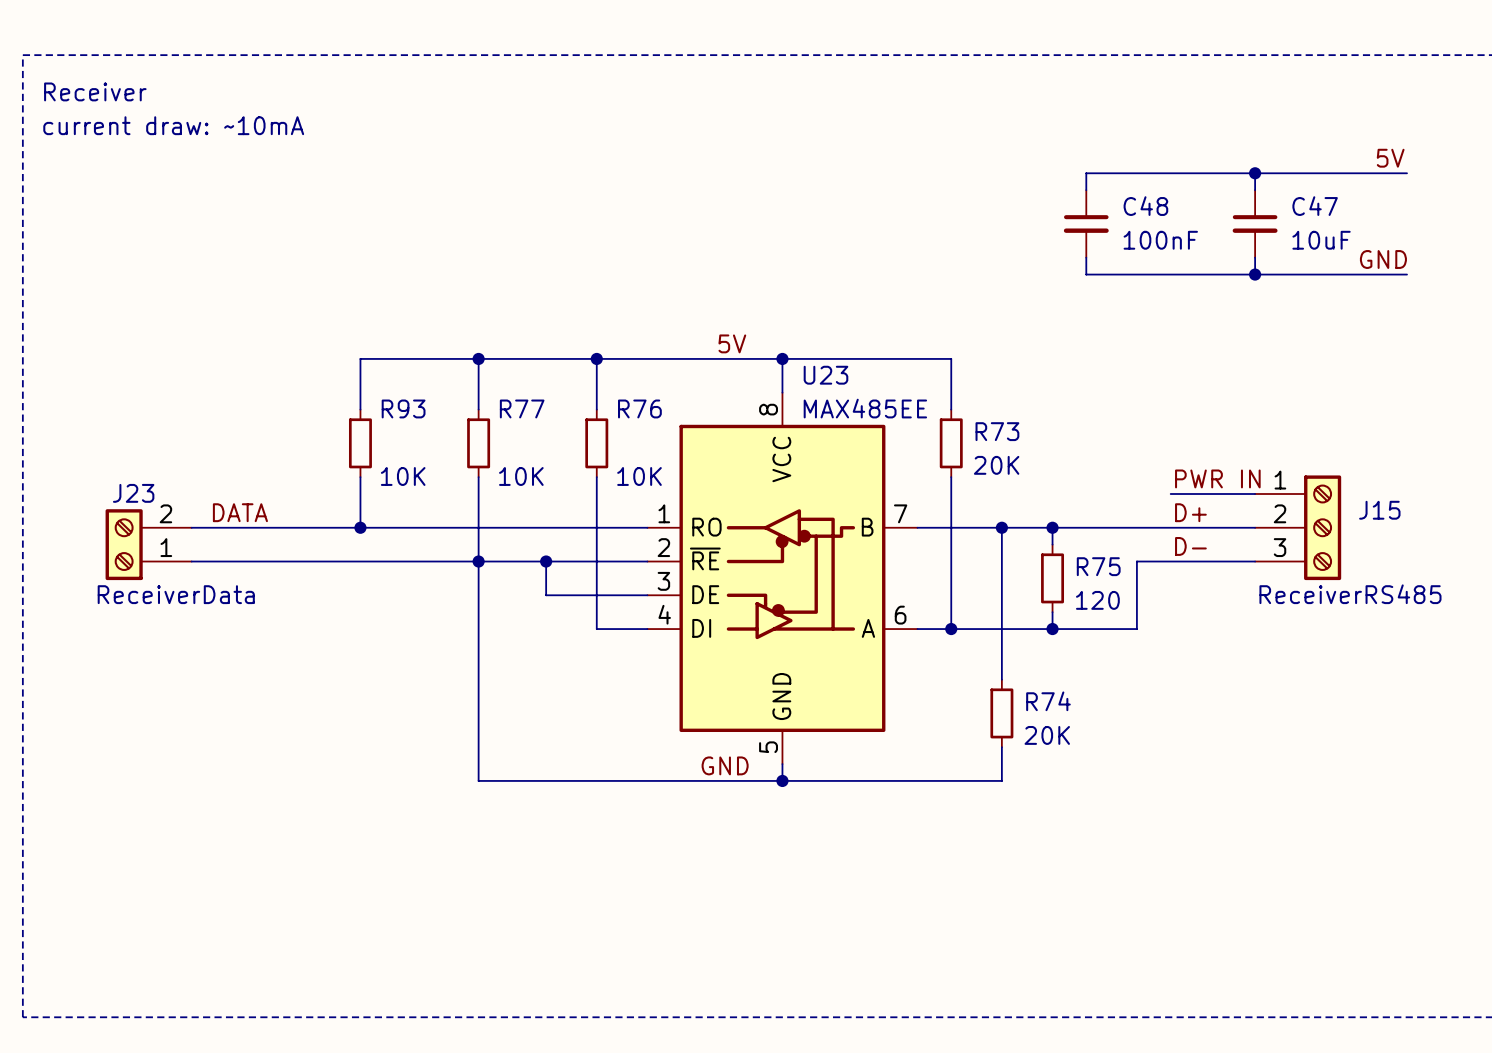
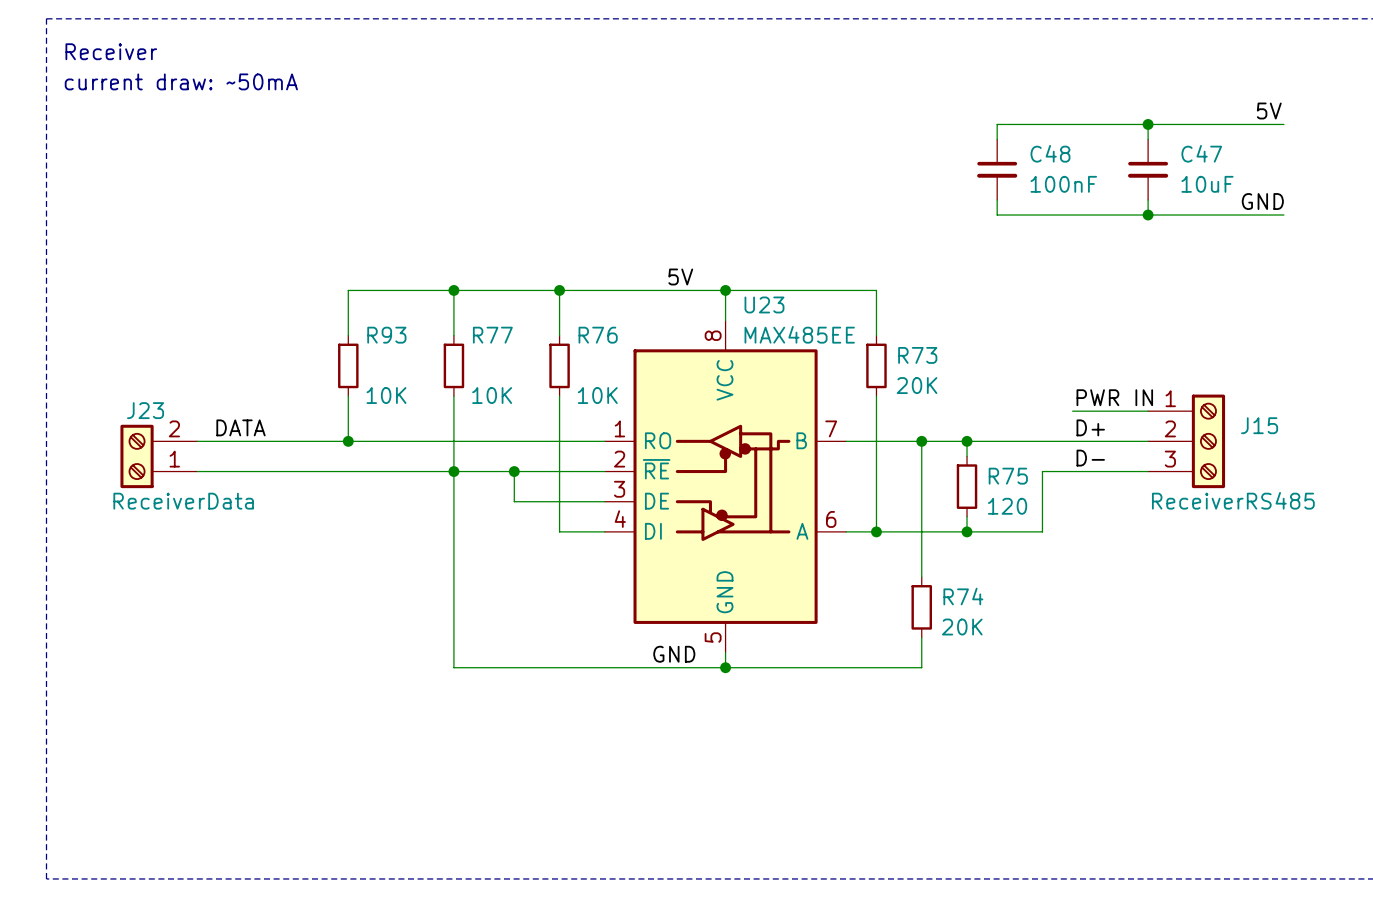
text: current draw: ~10mA (173, 125) -> current draw: ~50mA (181, 81)

